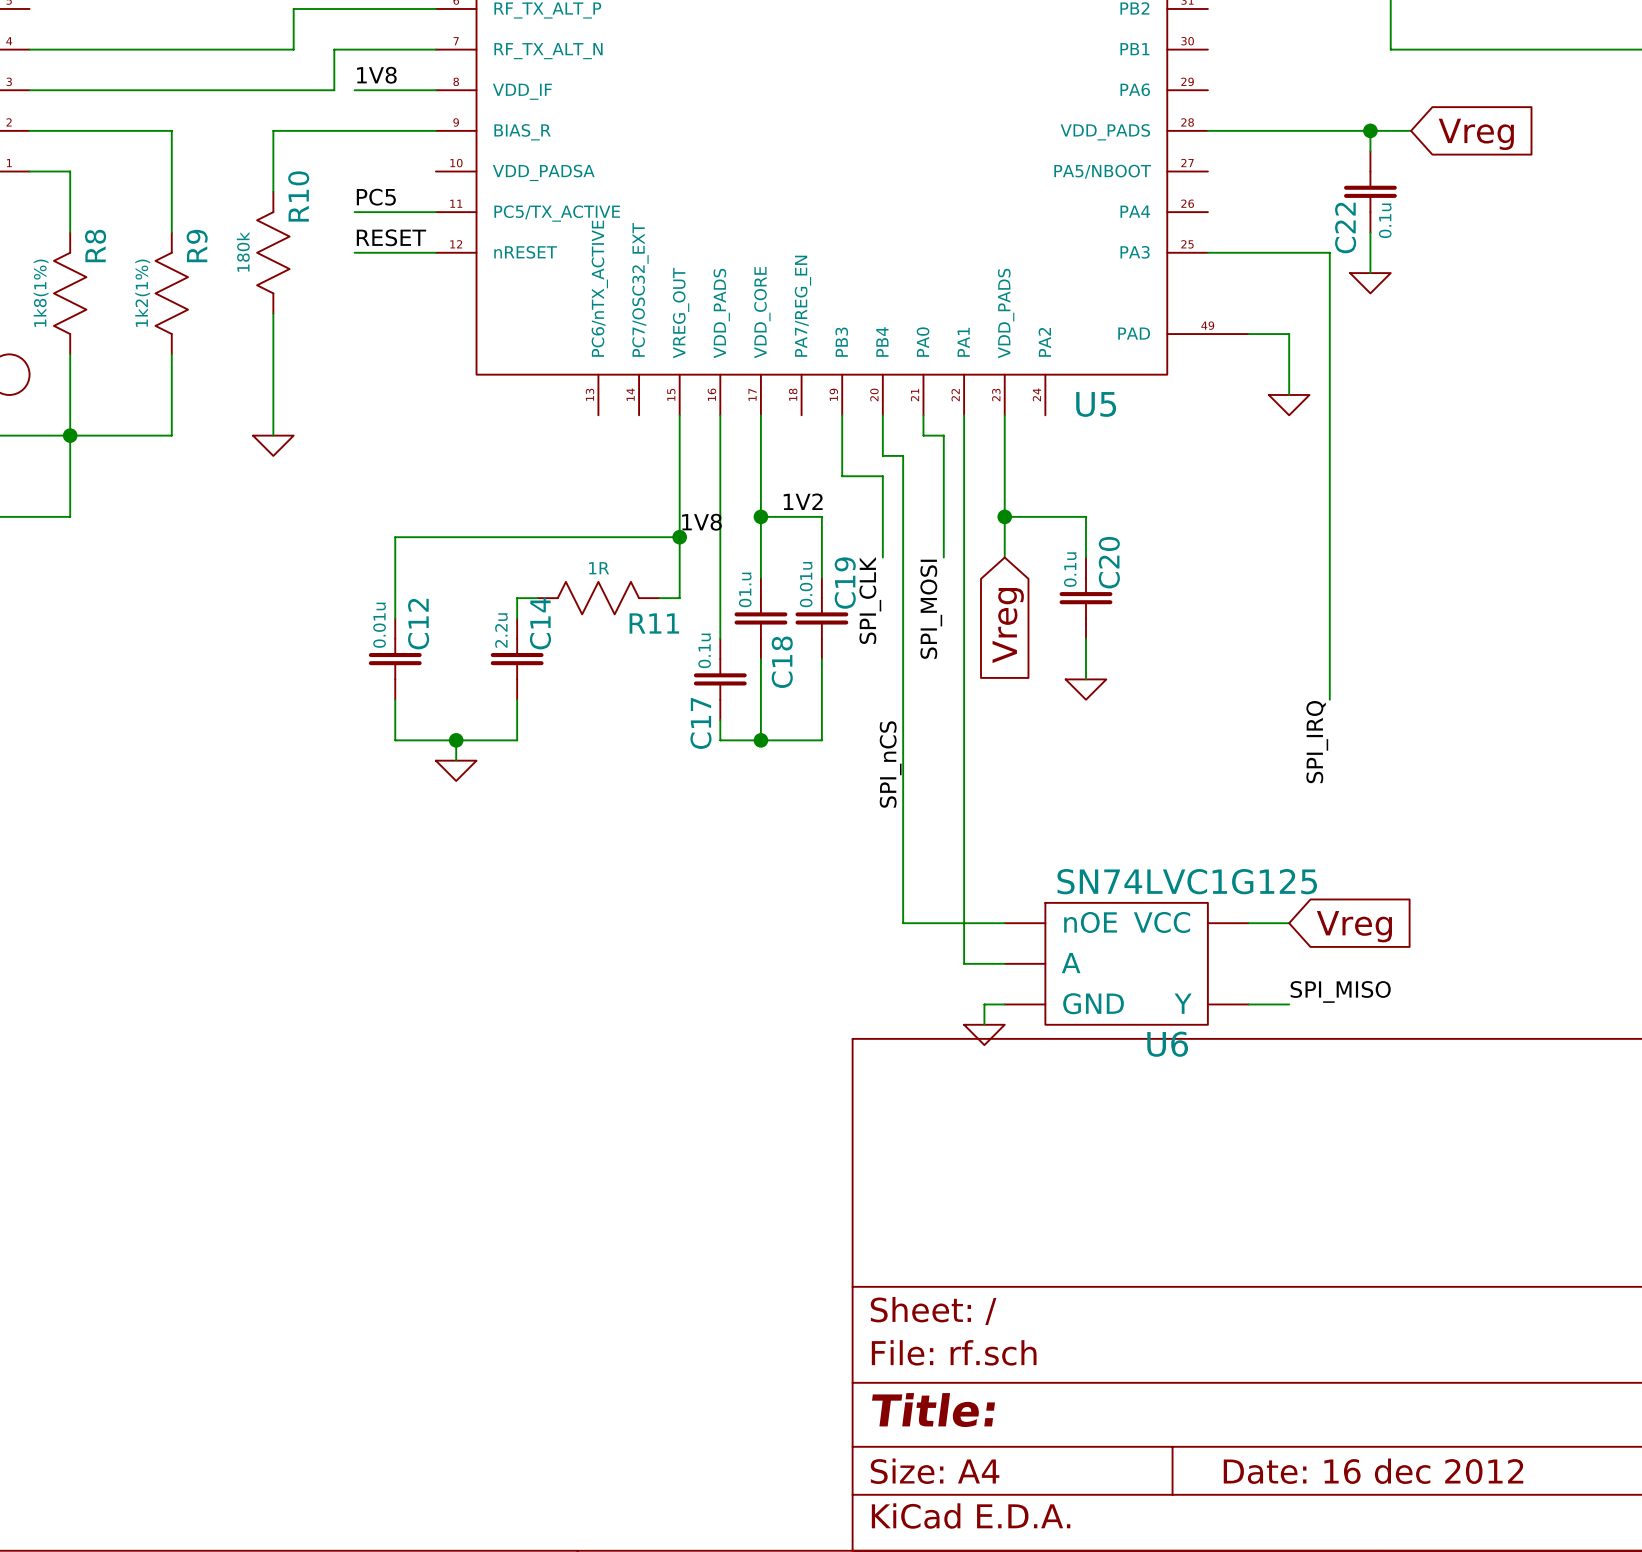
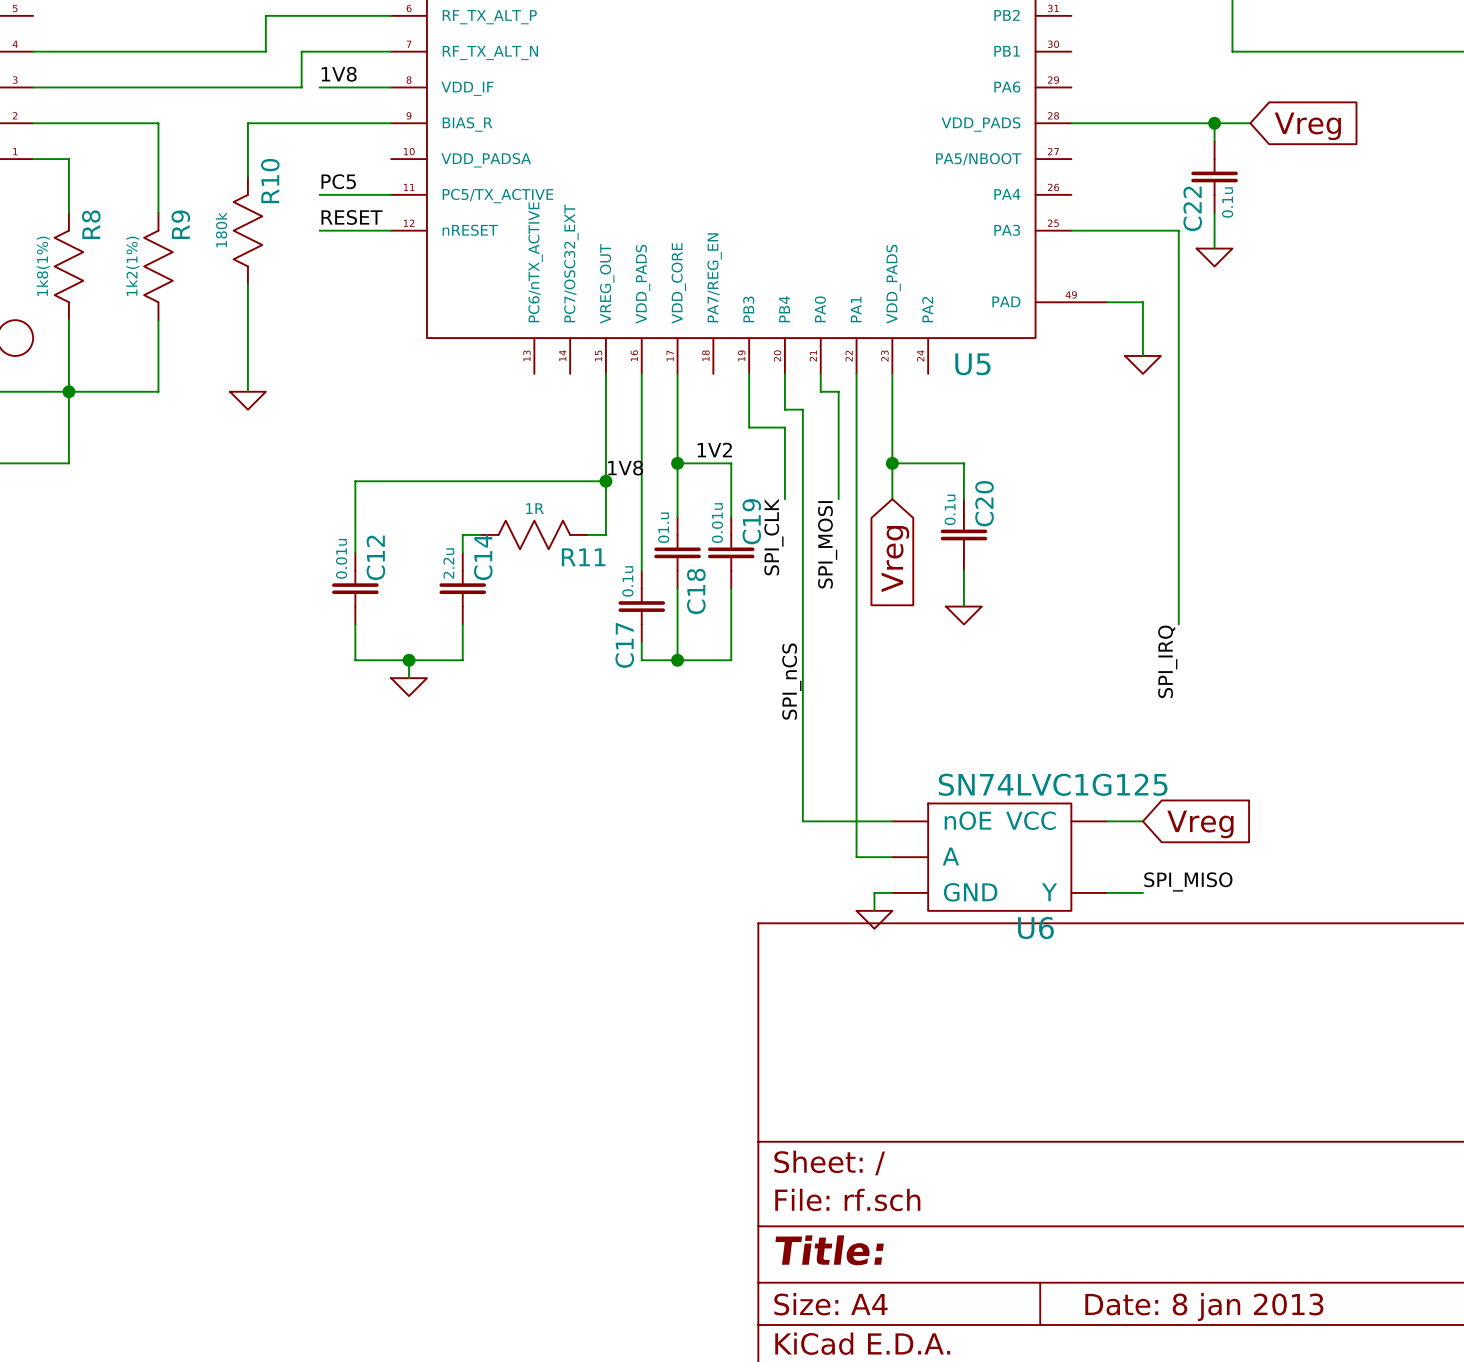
title block: Date: 16 dec 2012 (1373, 1471) -> Date: 8 jan 2013 (1204, 1307)

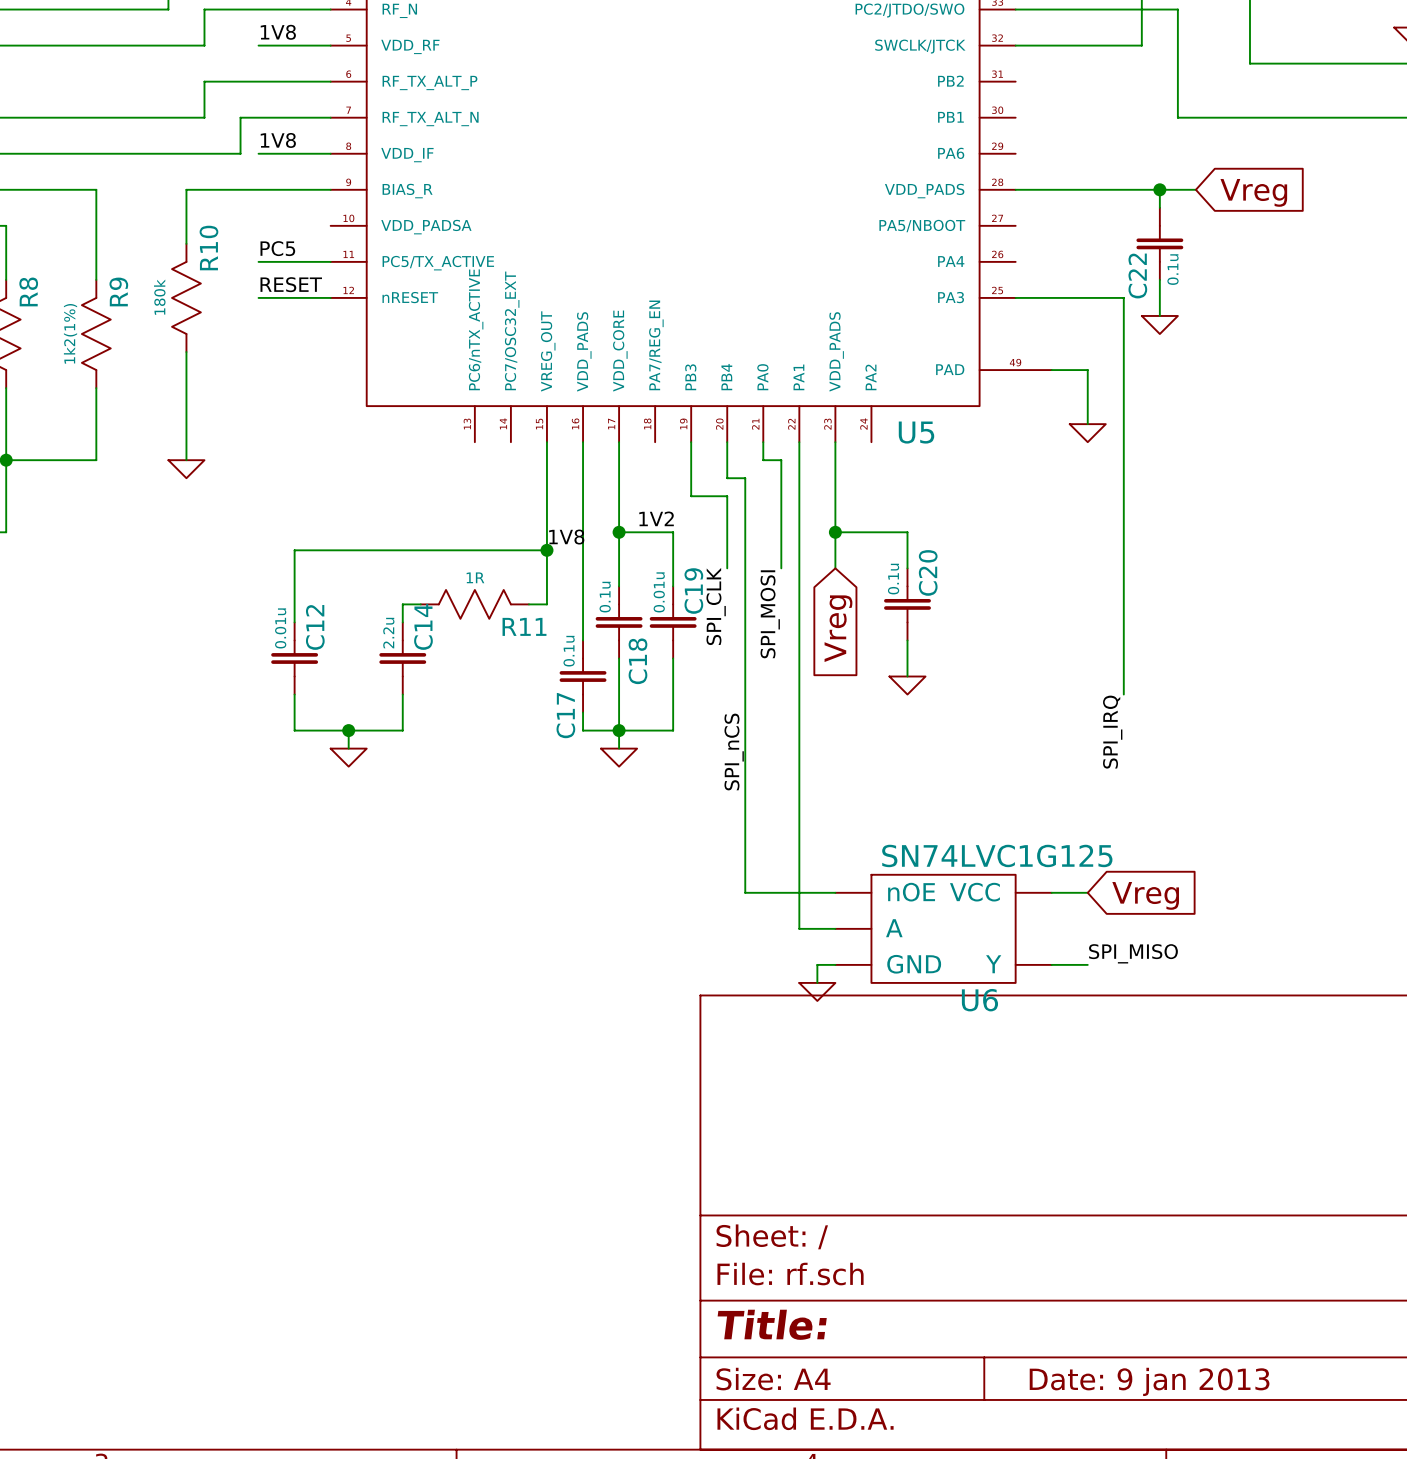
C18 value: 01.u (663, 527) -> 0.1u (605, 597)
wire: none -> (619, 730) (619, 748)
power symbol: none -> (619, 757)
title block: Date: 8 jan 2013 (1204, 1307) -> Date: 9 jan 2013 (1149, 1381)

